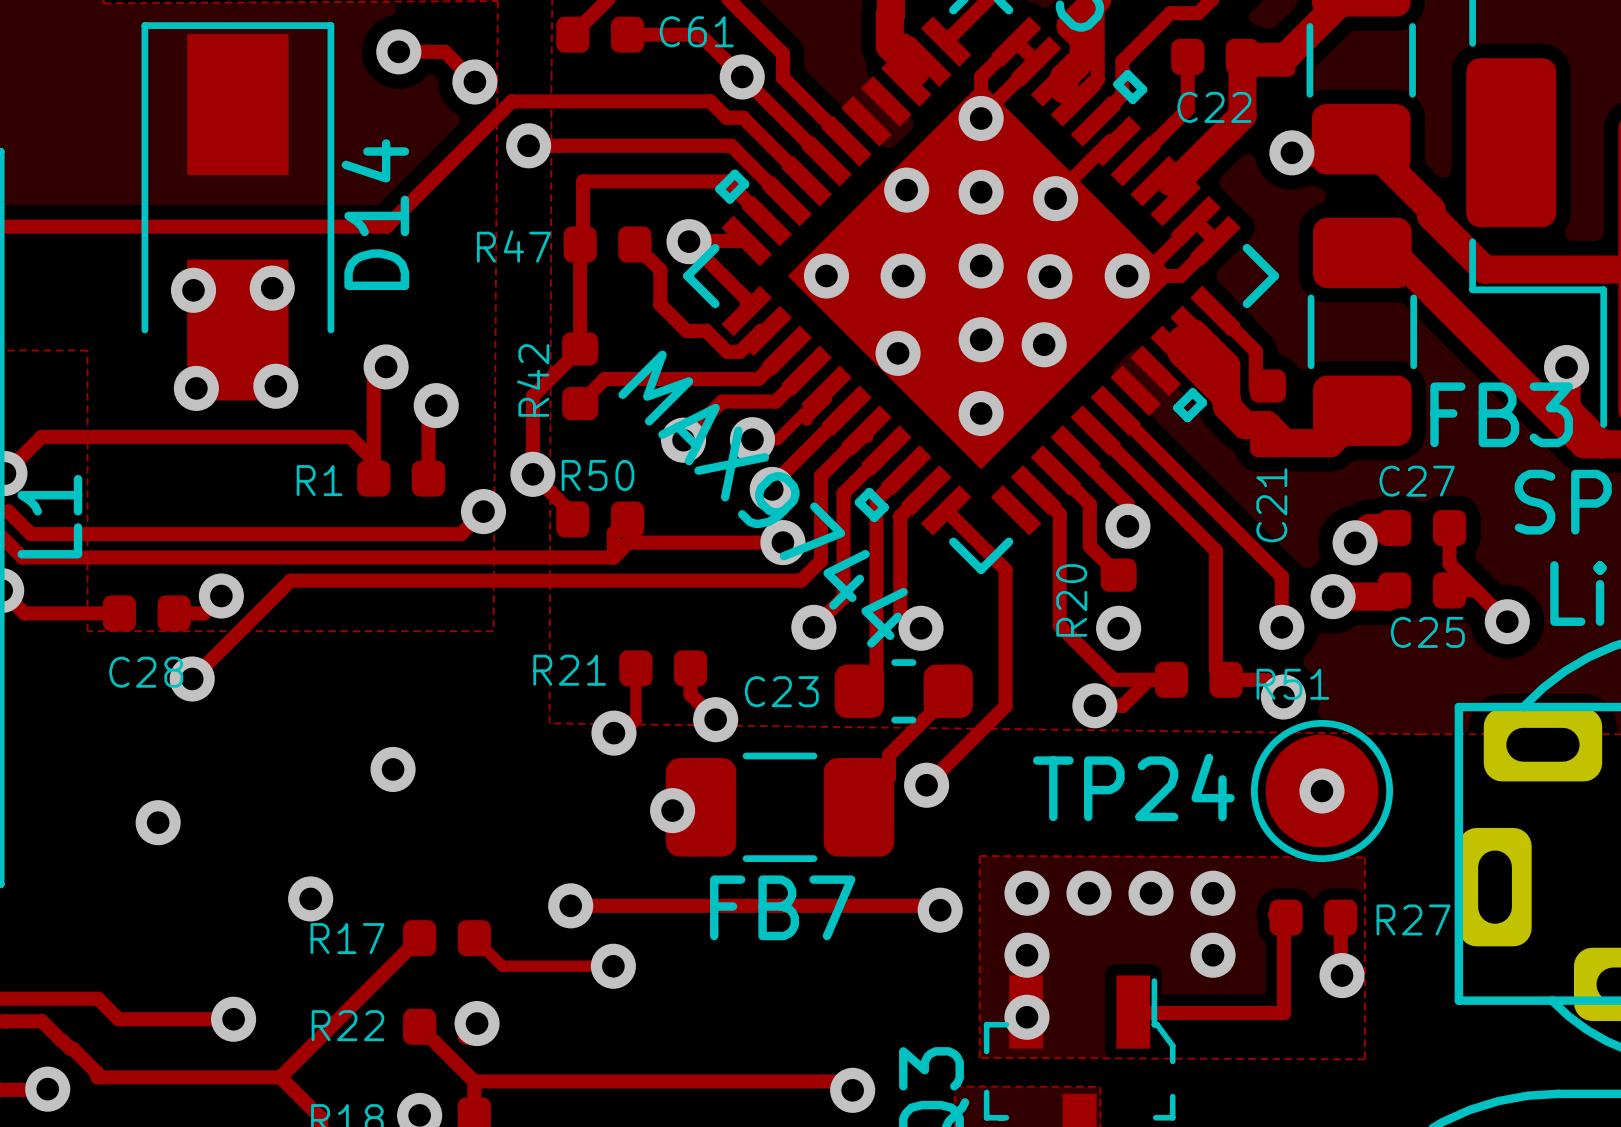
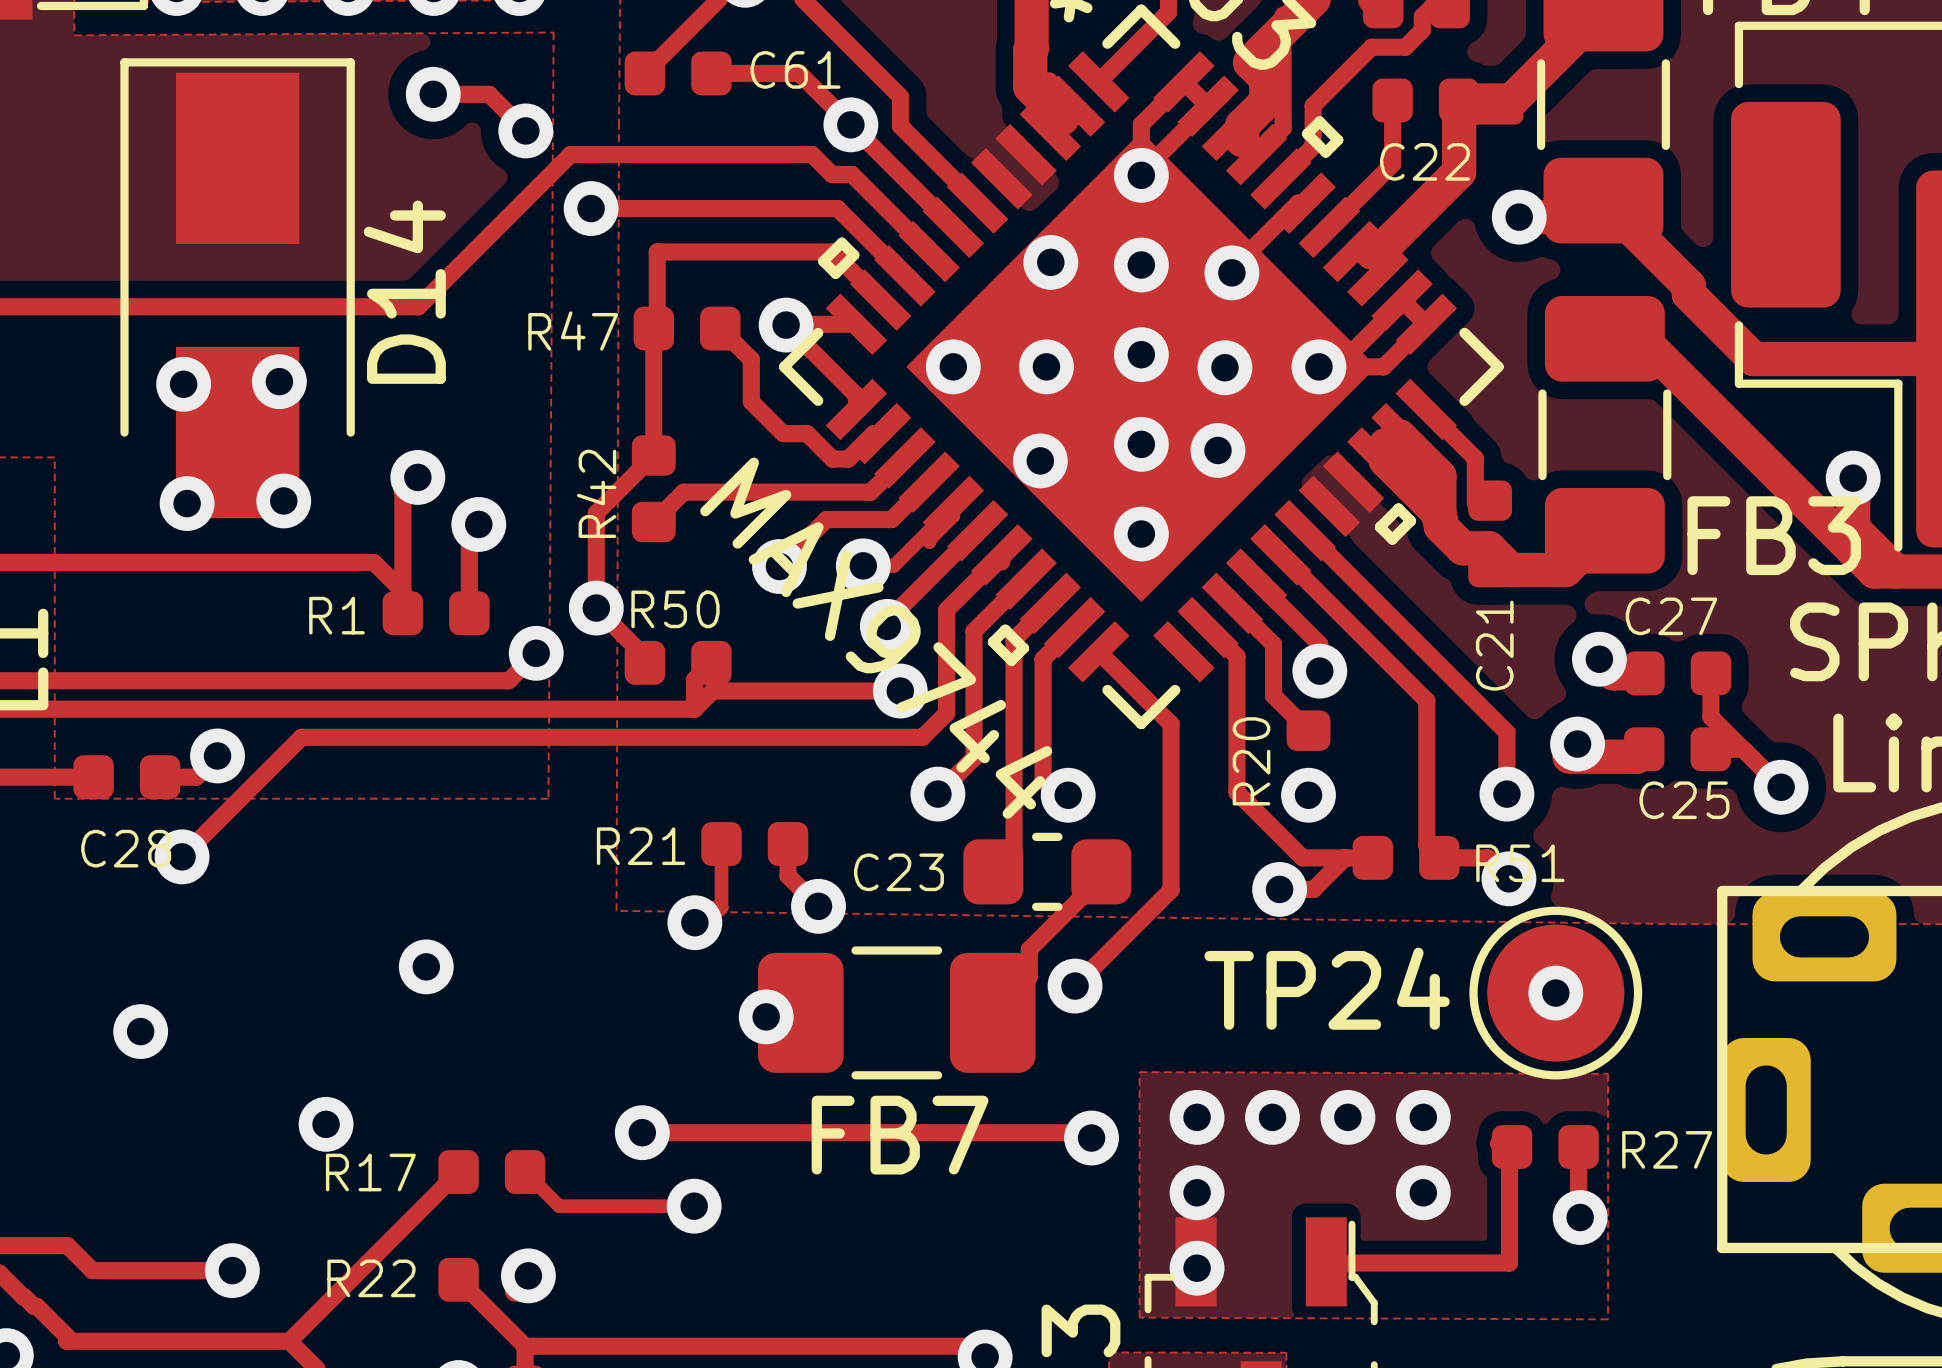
via position: (1355, 542) -> (1599, 659)
via position: (1333, 596) -> (1577, 744)

